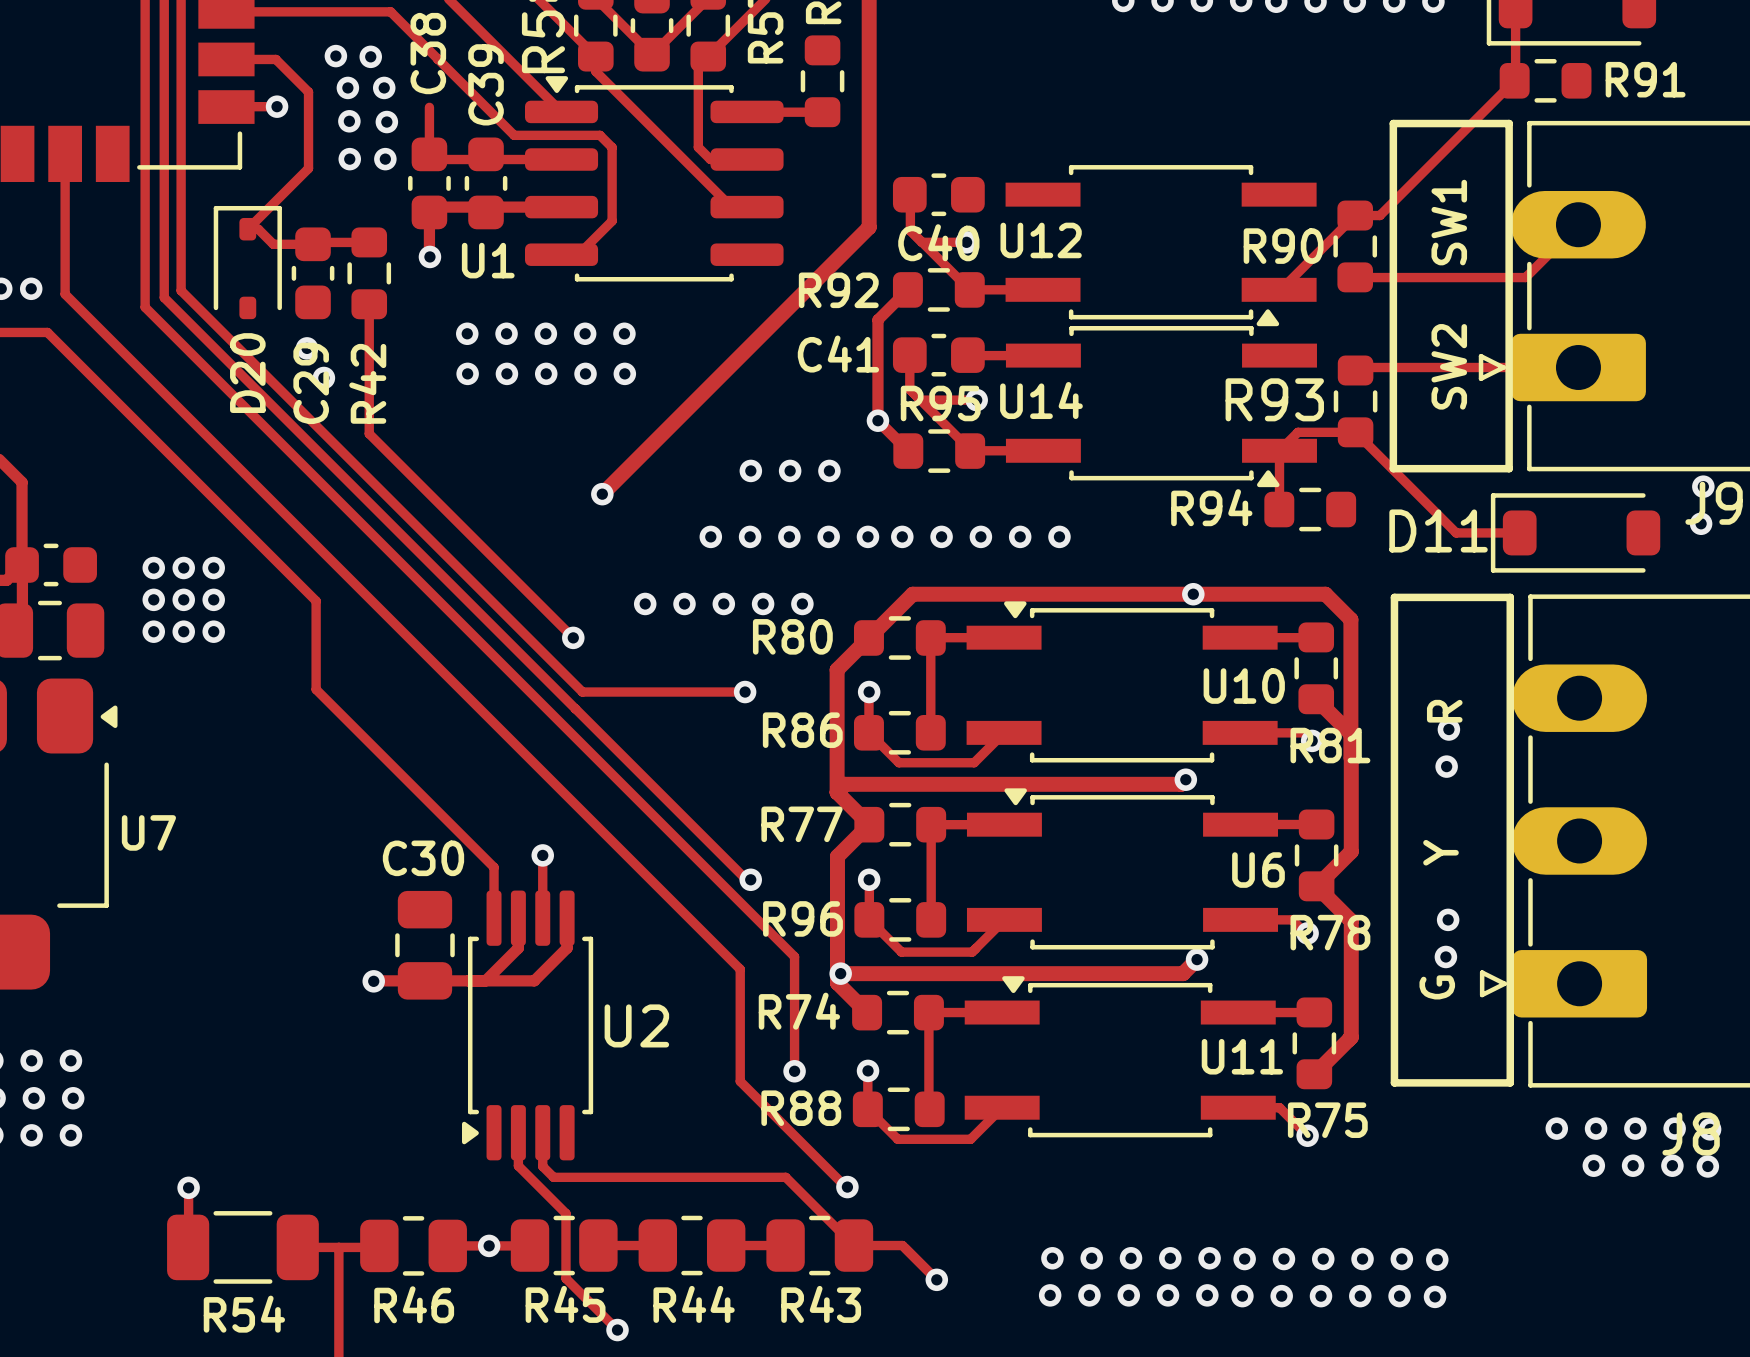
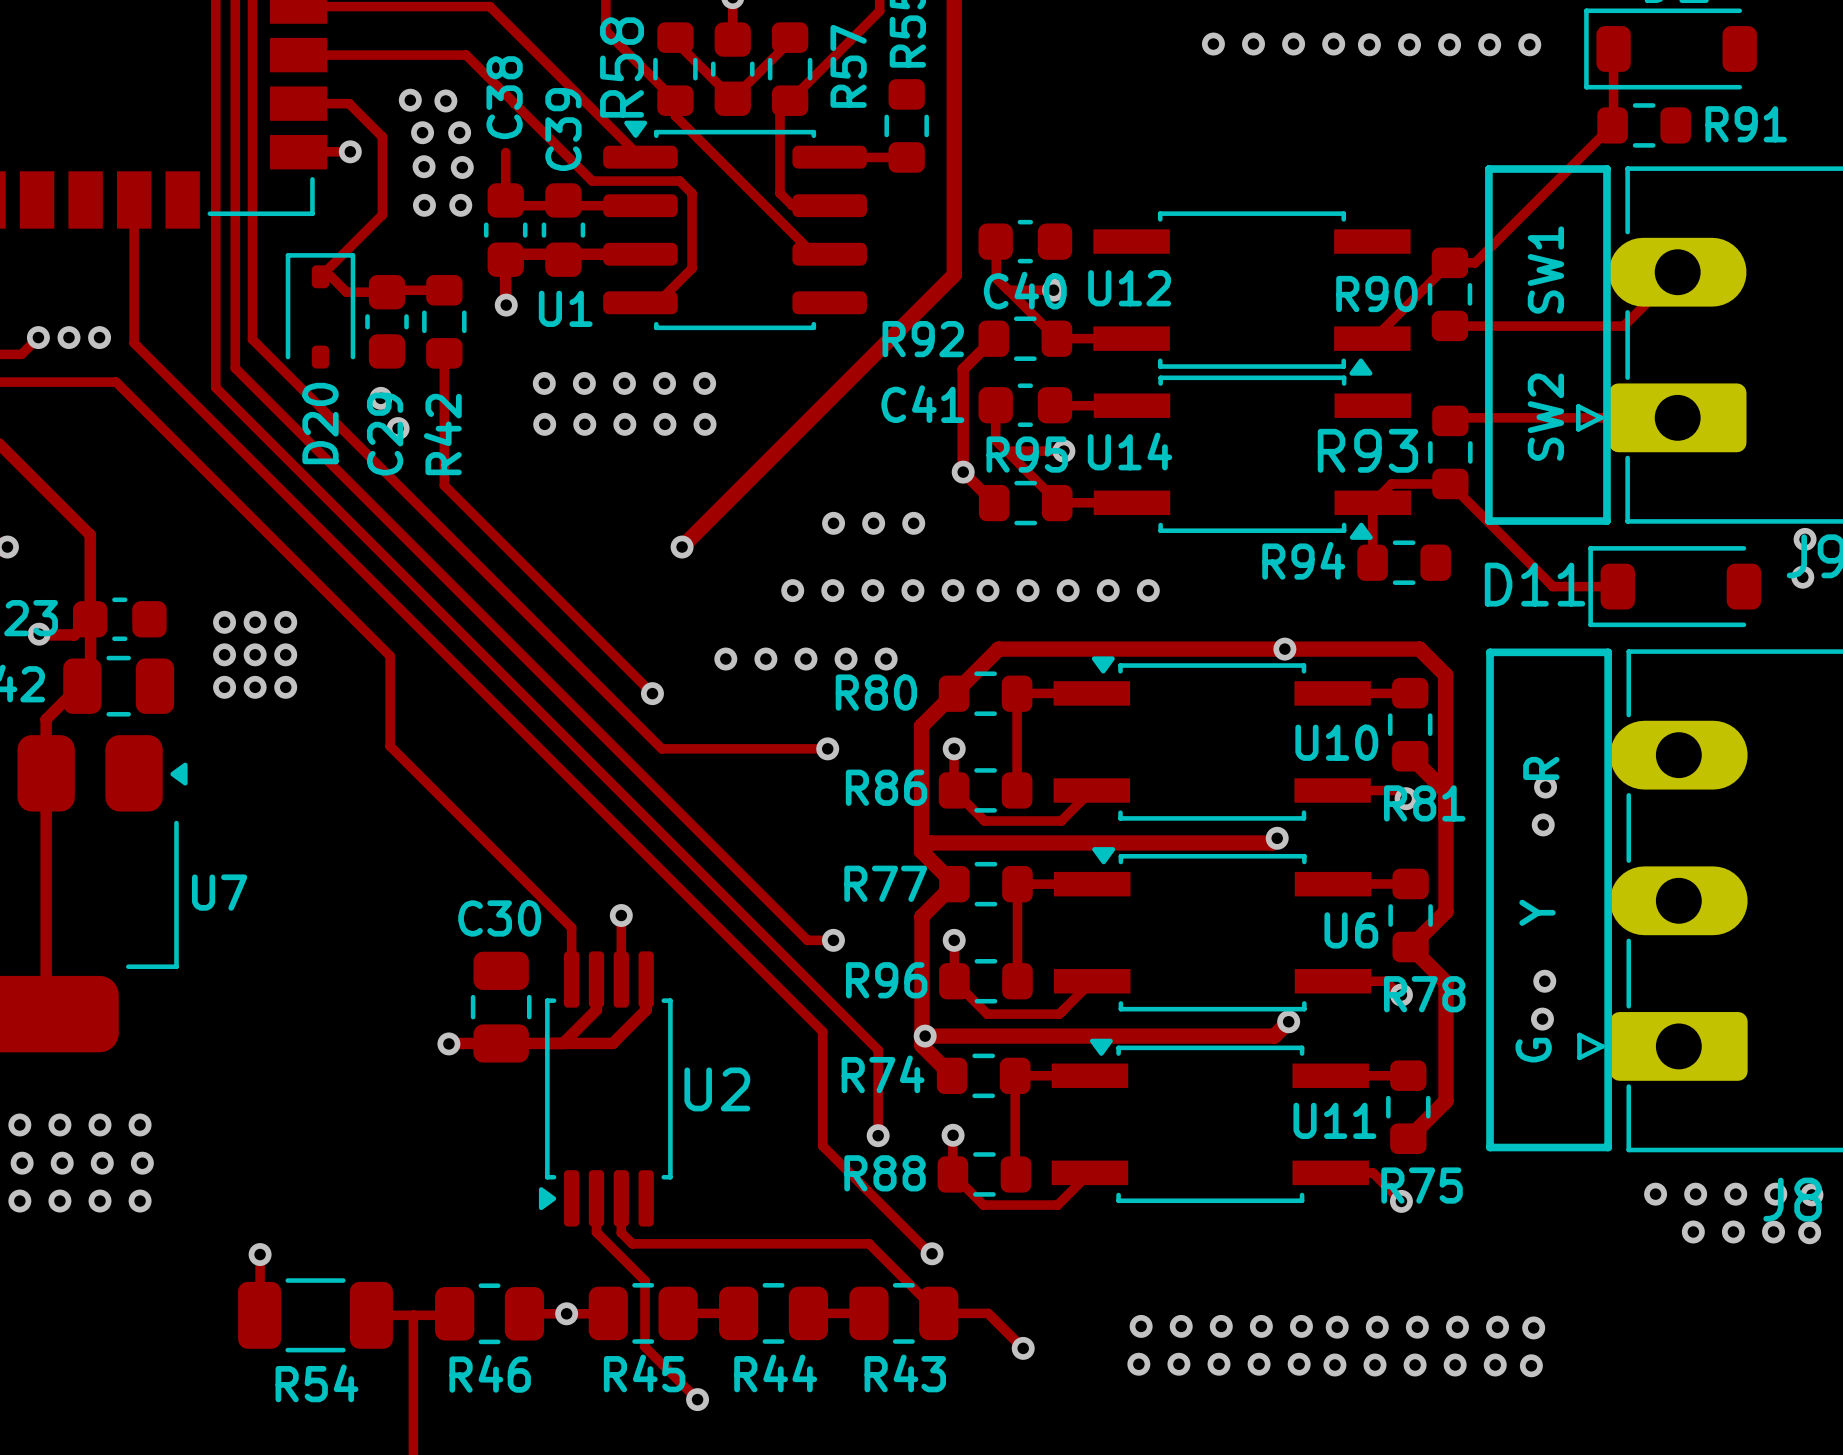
track: (164, 297) (746, 879) -> (235, 346) (235, 368) (807, 940) (828, 940)
track: (145, 307) (794, 956) (794, 987) -> (215, 356) (215, 387) (878, 1050)

